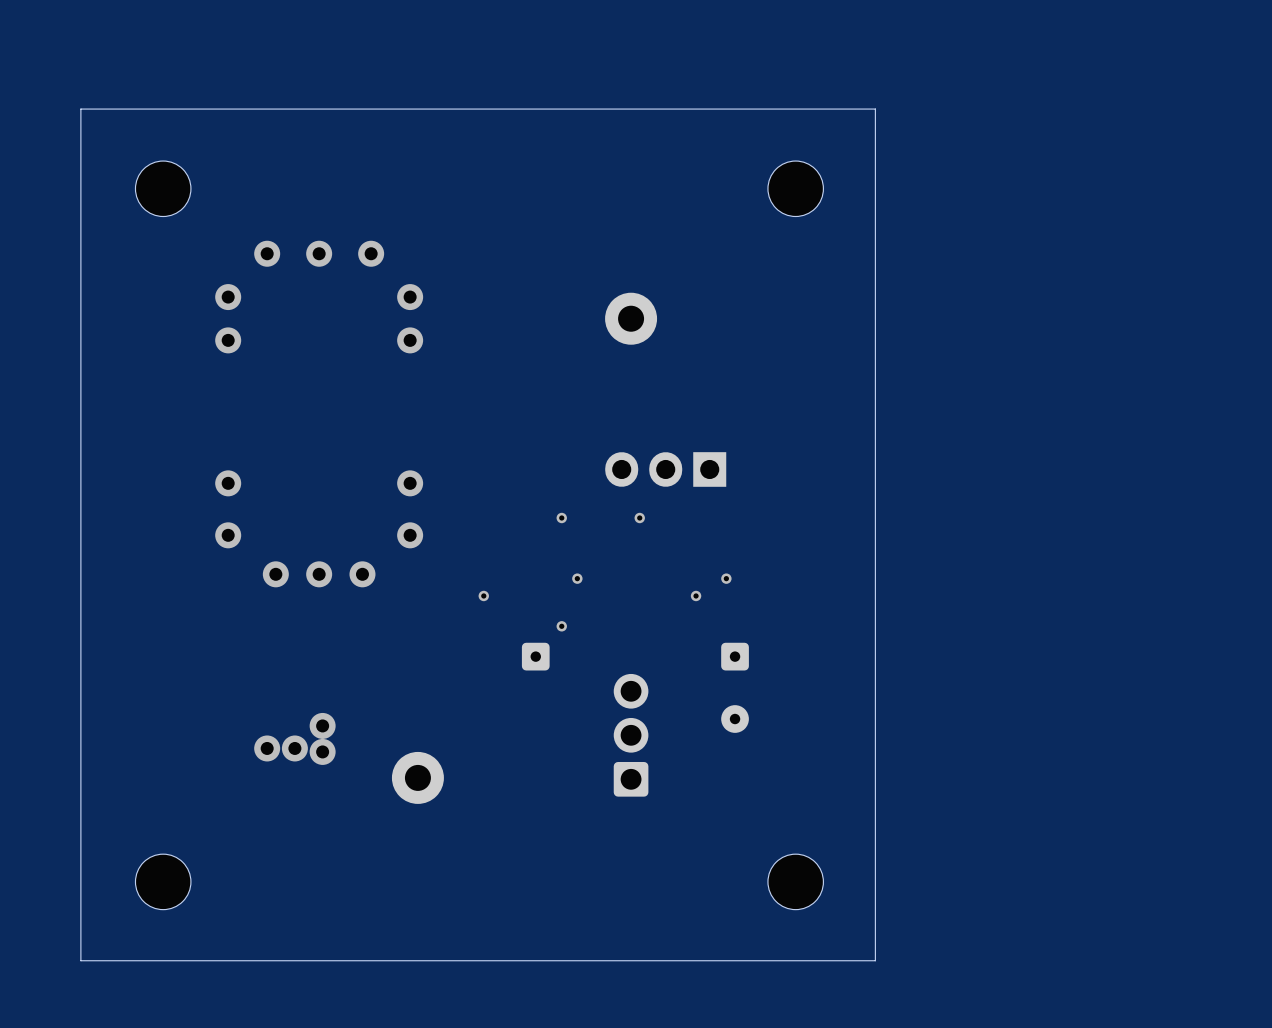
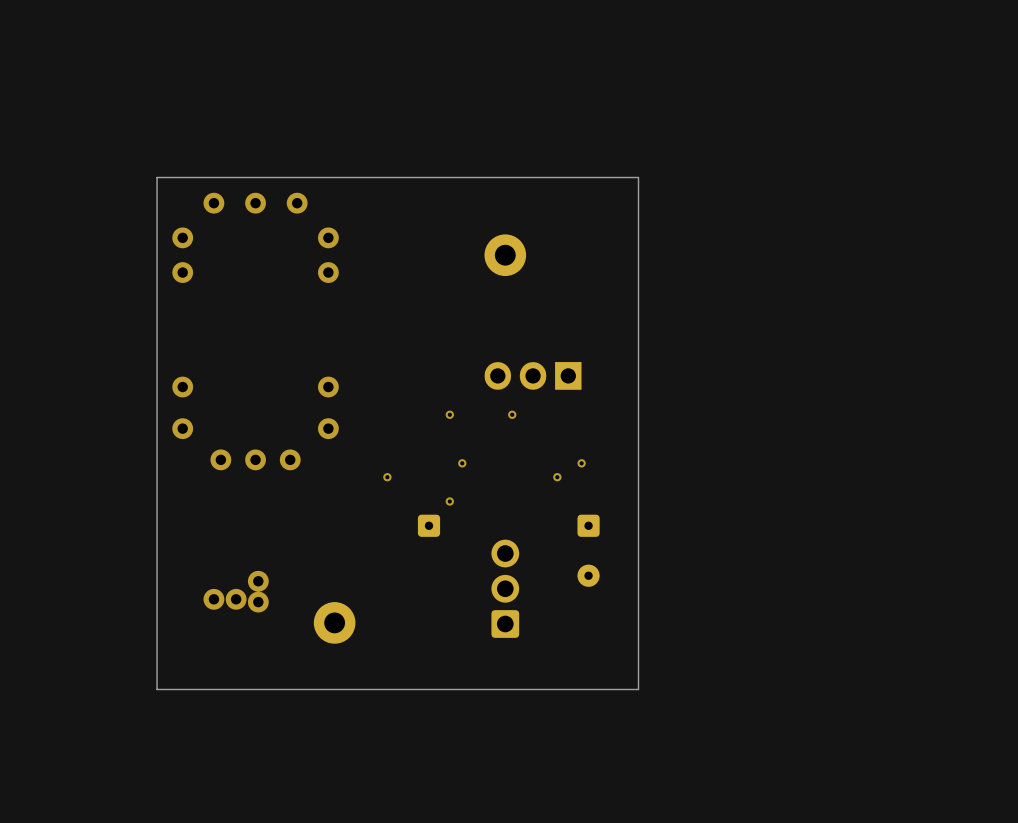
board edge: (875, 109) (80, 109) (80, 960) (875, 960) (875, 109) -> (638, 177) (638, 689) (157, 689) (157, 177) (638, 177)
part: (163, 188) -> none
part: (795, 188) -> none
part: (163, 881) -> none
part: (795, 881) -> none

